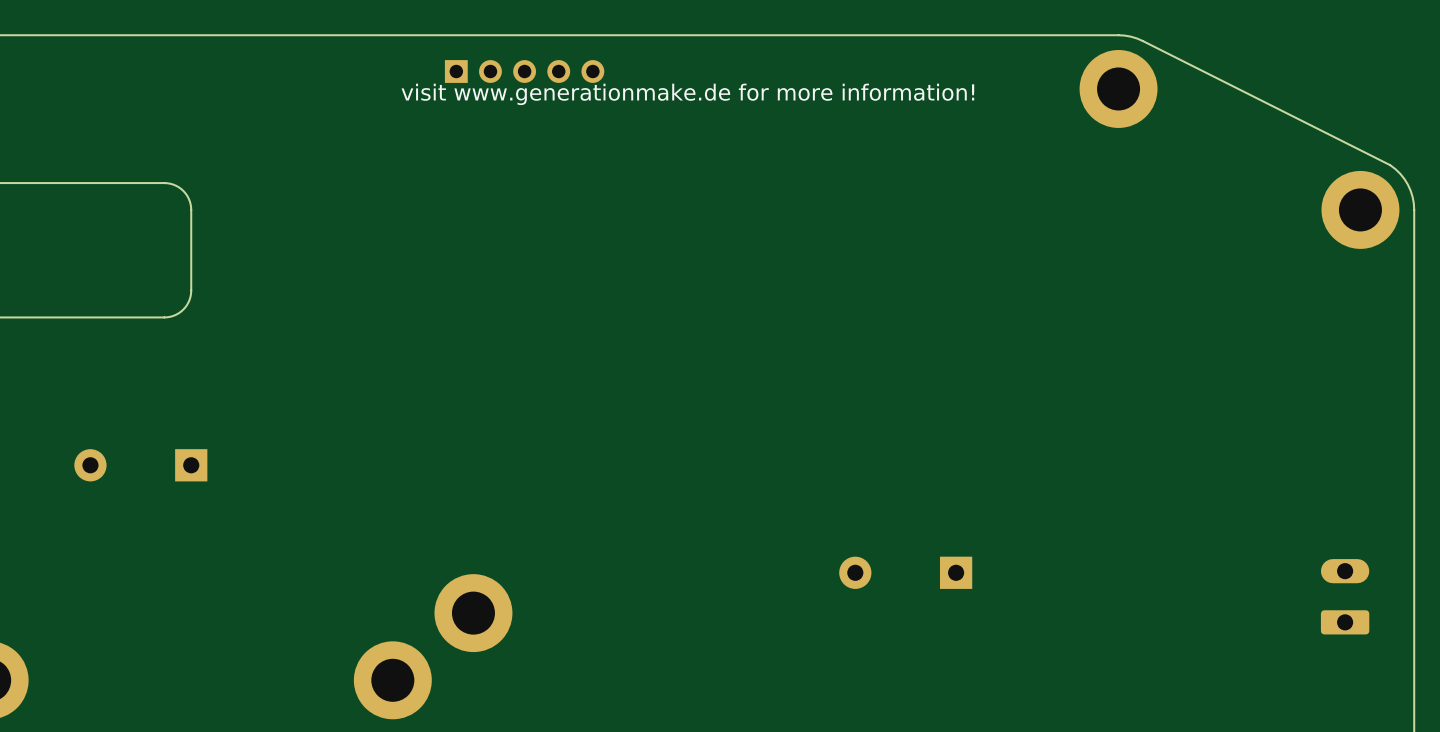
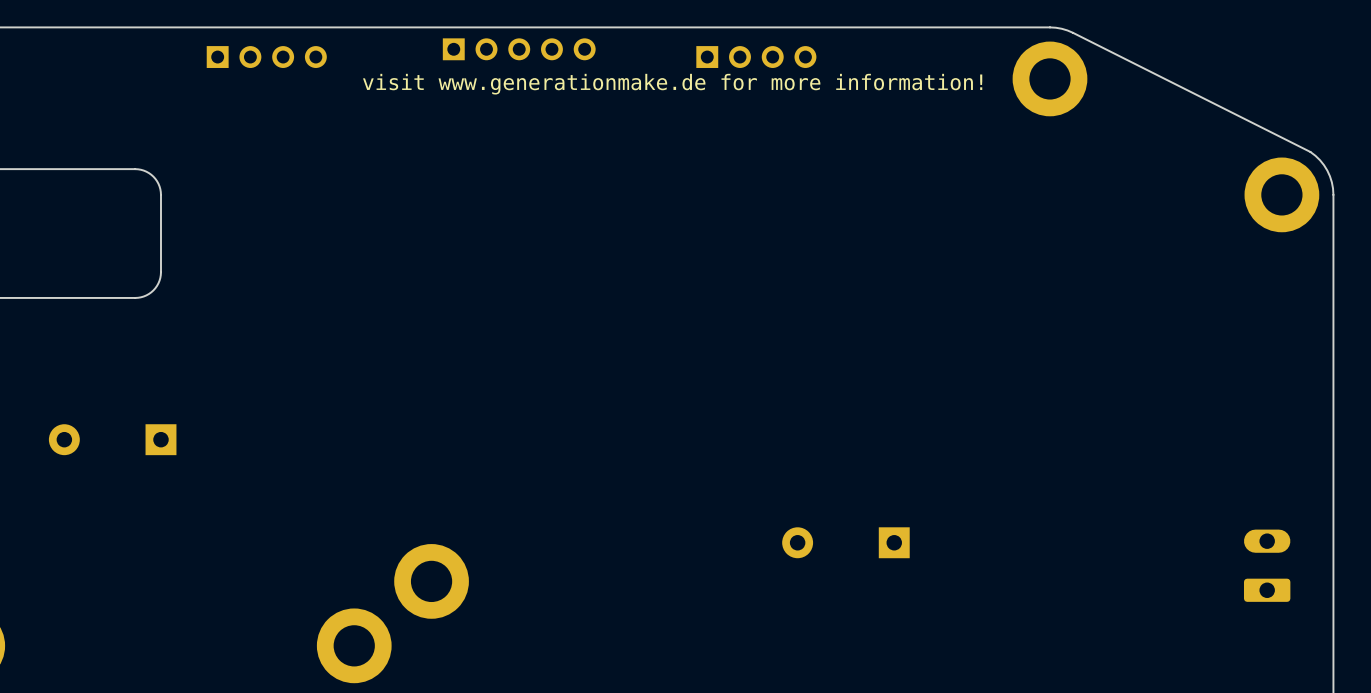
part: none -> (266, 57)
part: none -> (756, 57)
part position: (524, 71) -> (519, 49)

